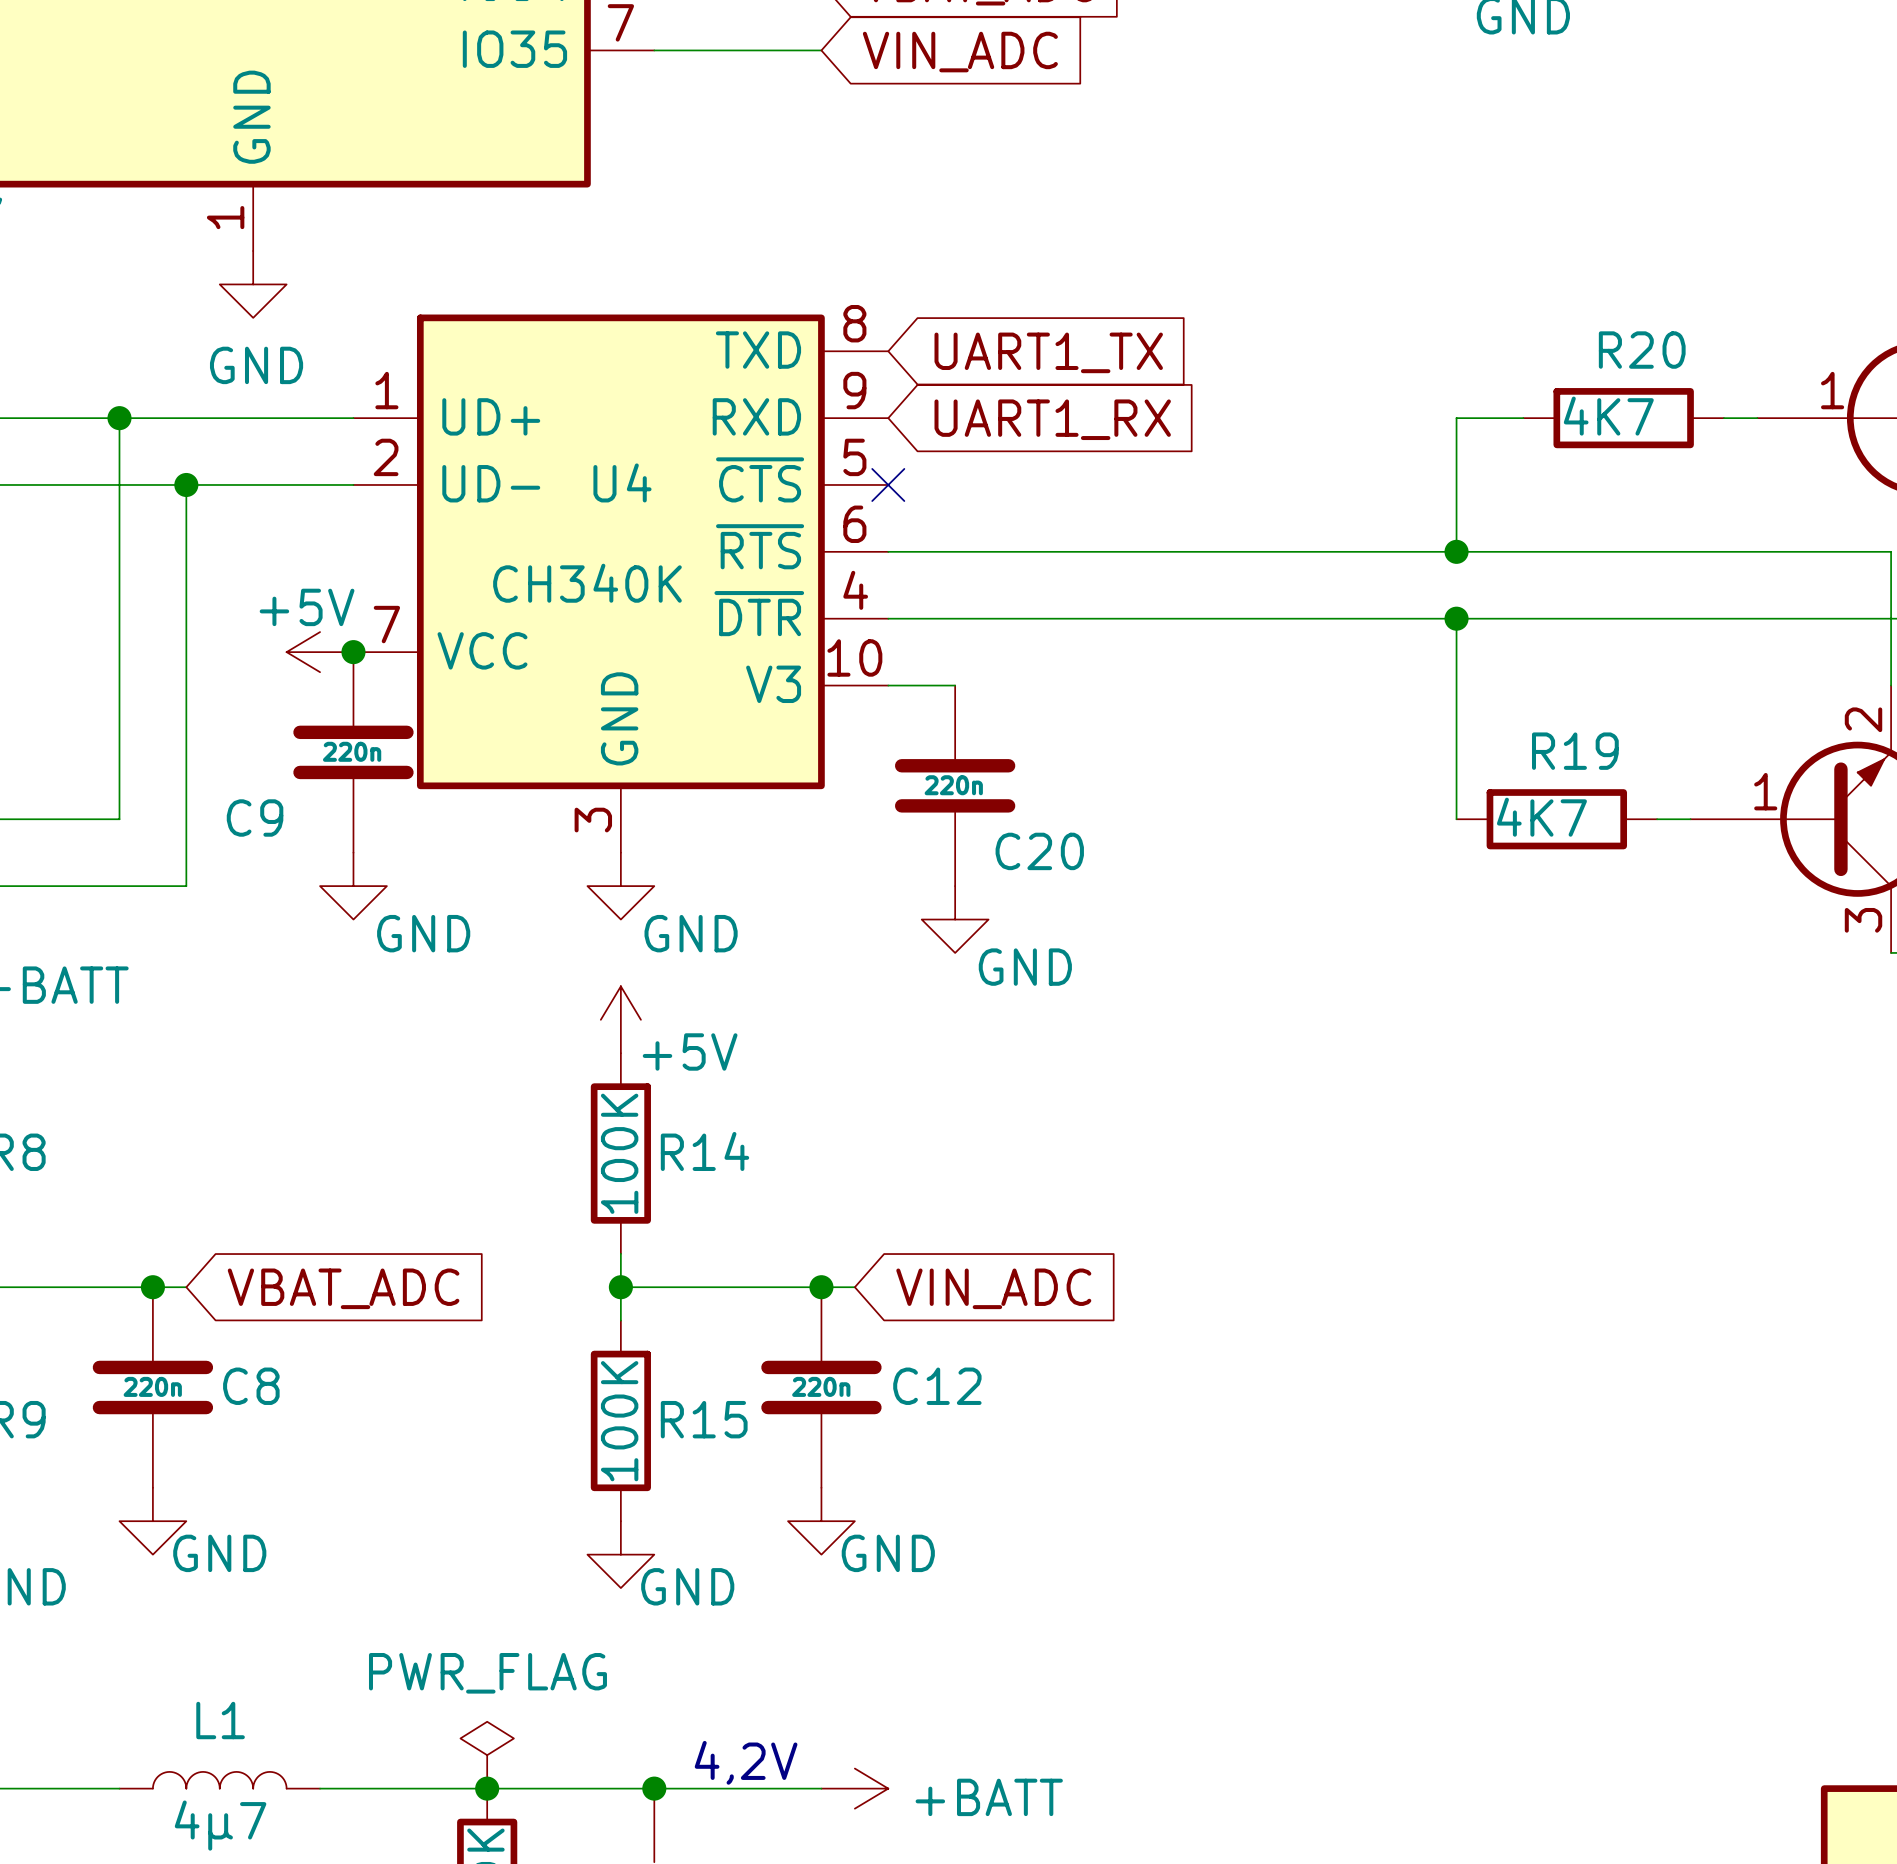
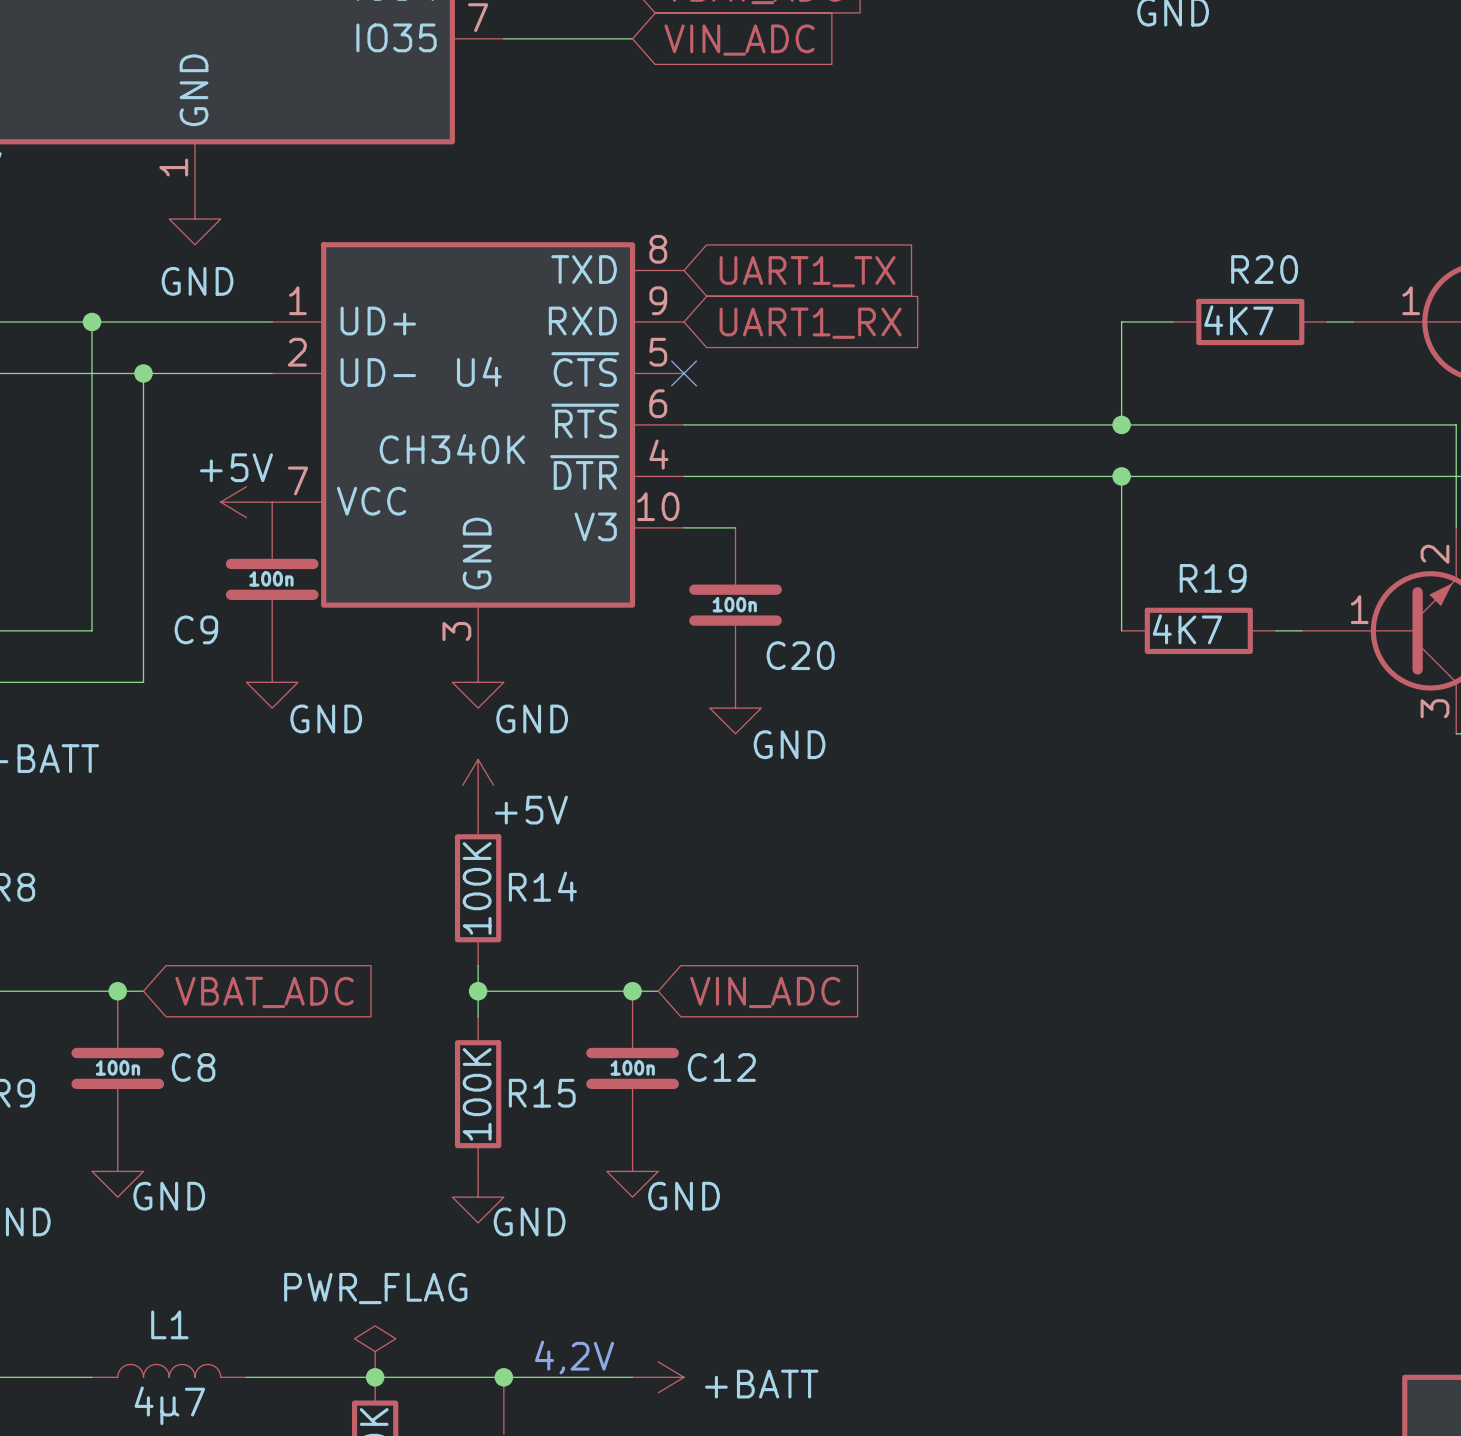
junction: (353, 652) -> none
C9 value: 220n (352, 751) -> 100n (271, 578)
C20 value: 220n (953, 785) -> 100n (734, 604)
C8 value: 220n (152, 1386) -> 100n (117, 1067)
C12 value: 220n (821, 1386) -> 100n (632, 1067)

